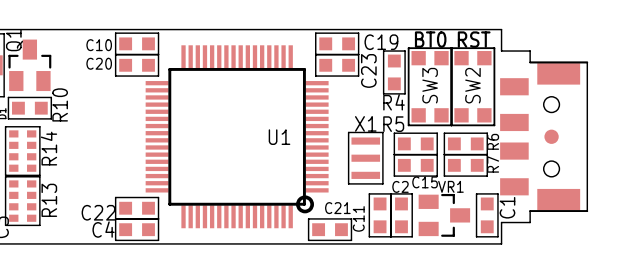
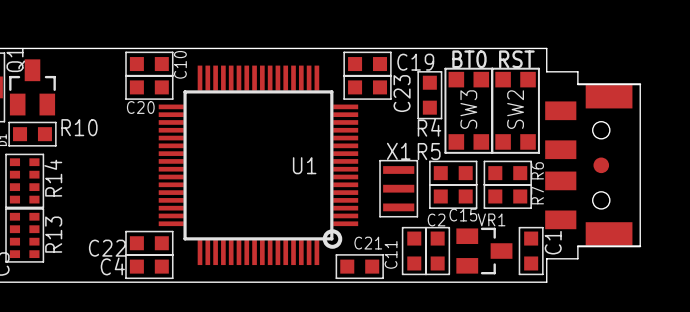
C10 name rotation: 0° (99, 45) -> 90° counterclockwise (180, 64)
C10 name position: C10 (99, 45) -> C10 (180, 64)
C20 name position: C20 (99, 63) -> C20 (140, 107)
R10 name rotation: 0° (60, 104) -> 90° clockwise (79, 127)

